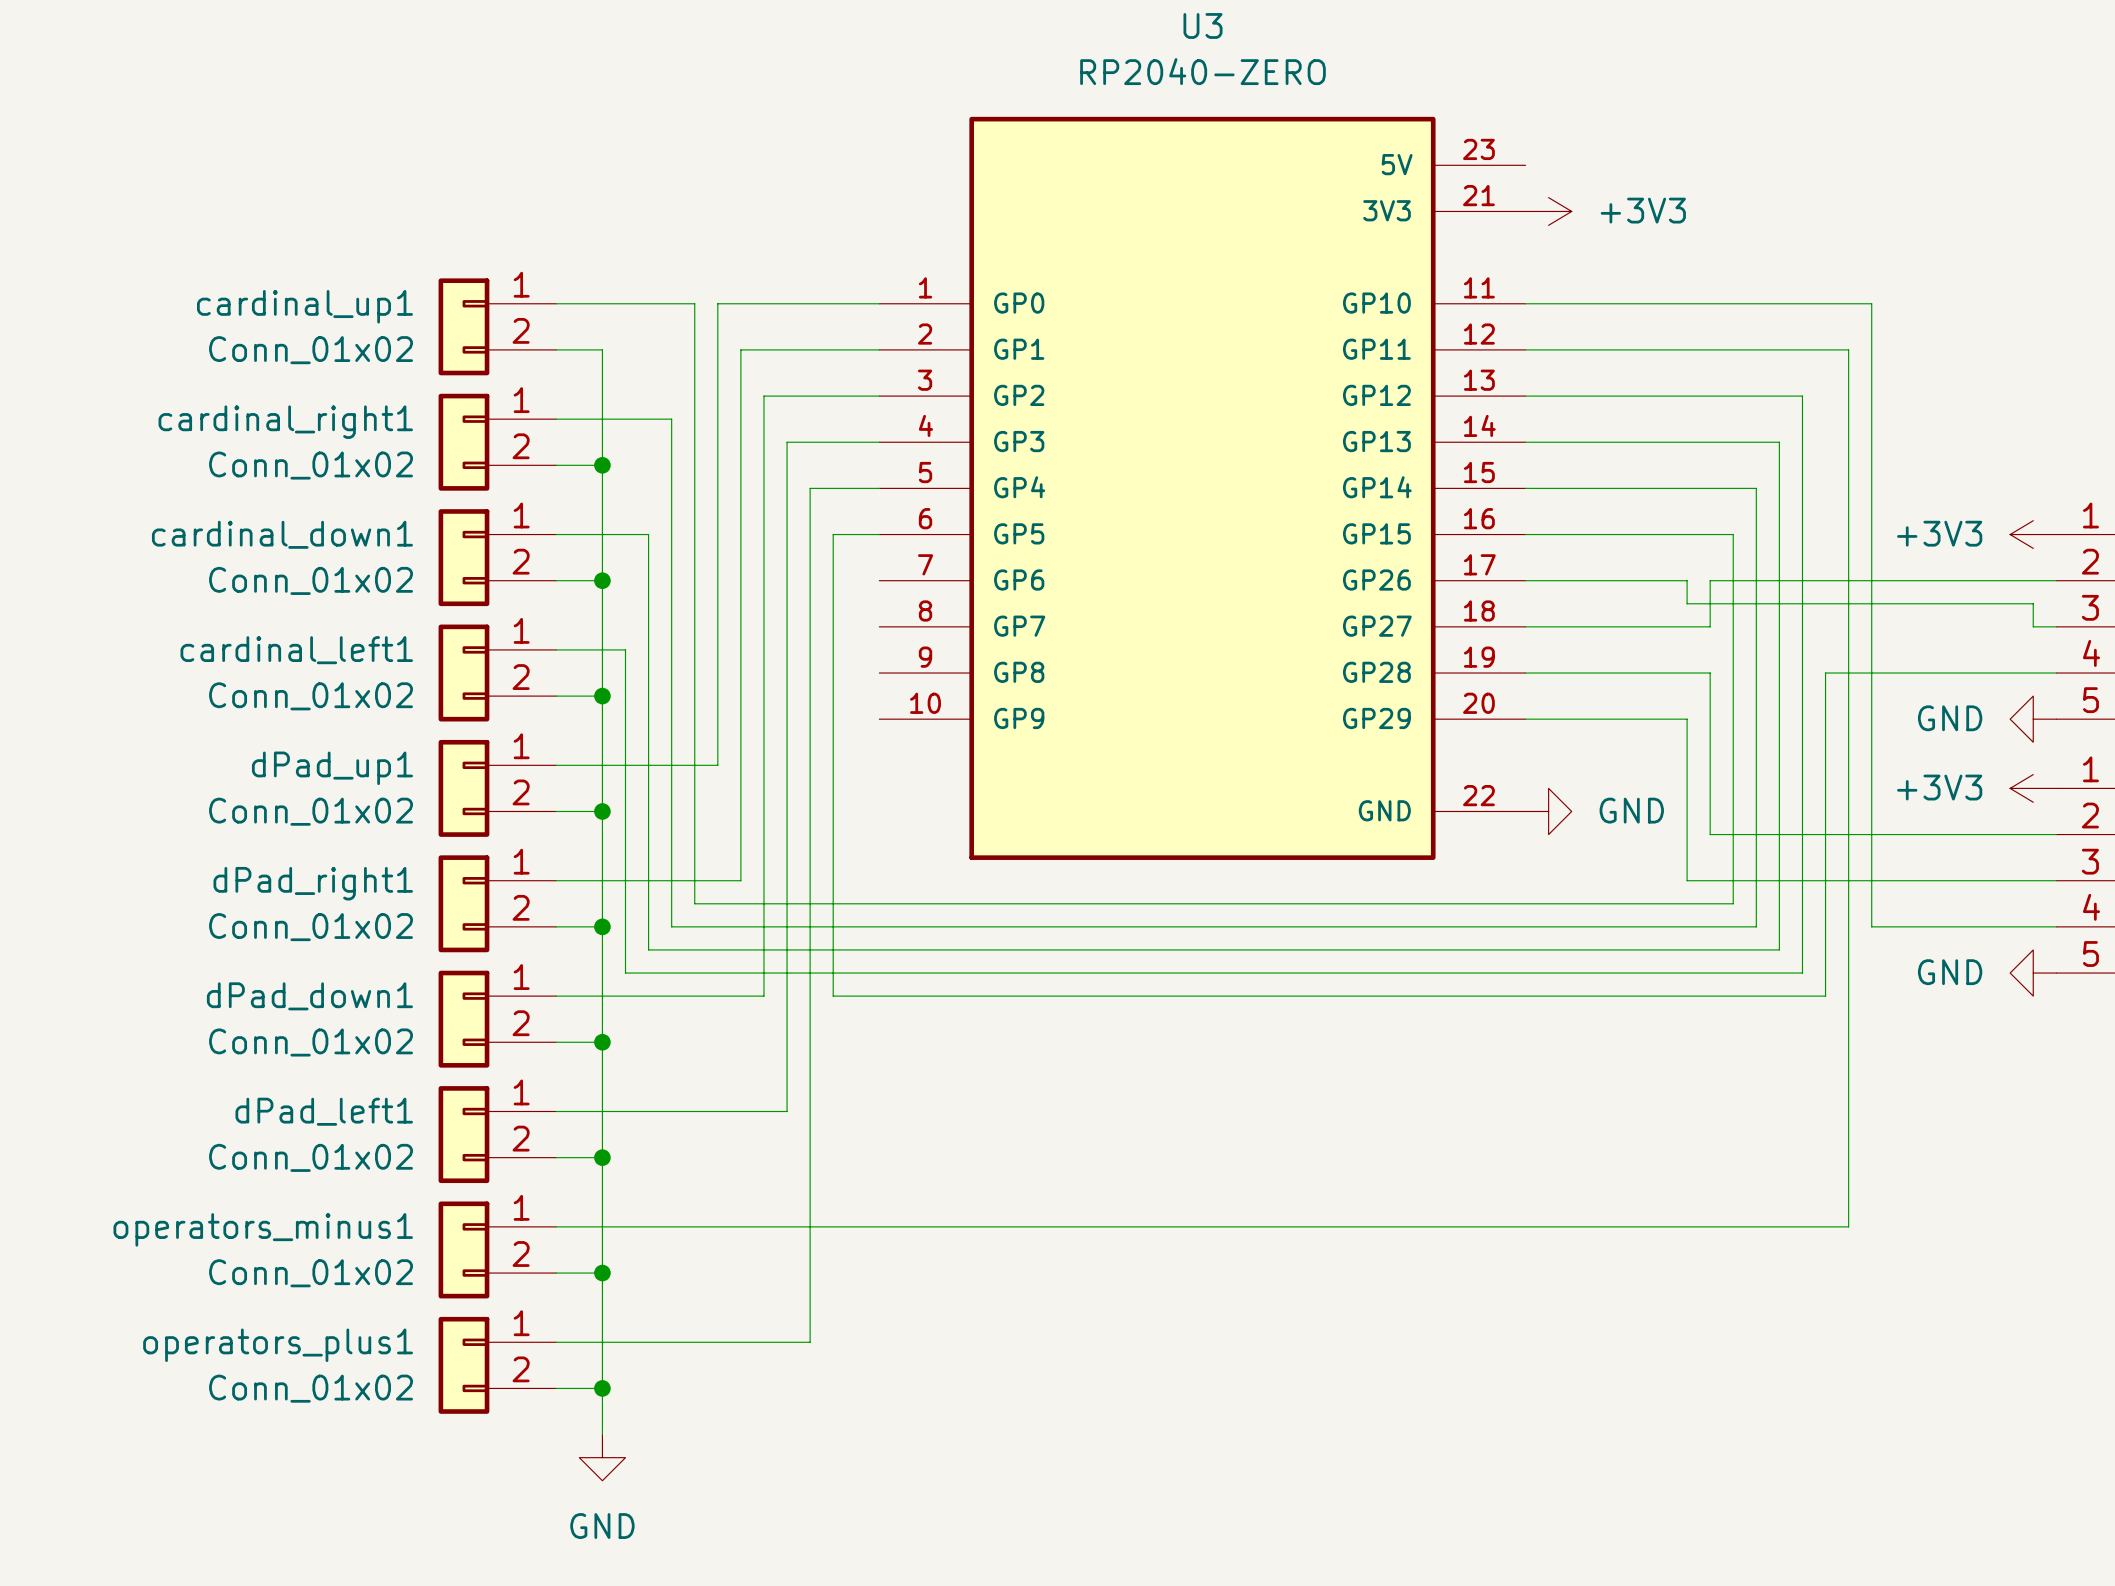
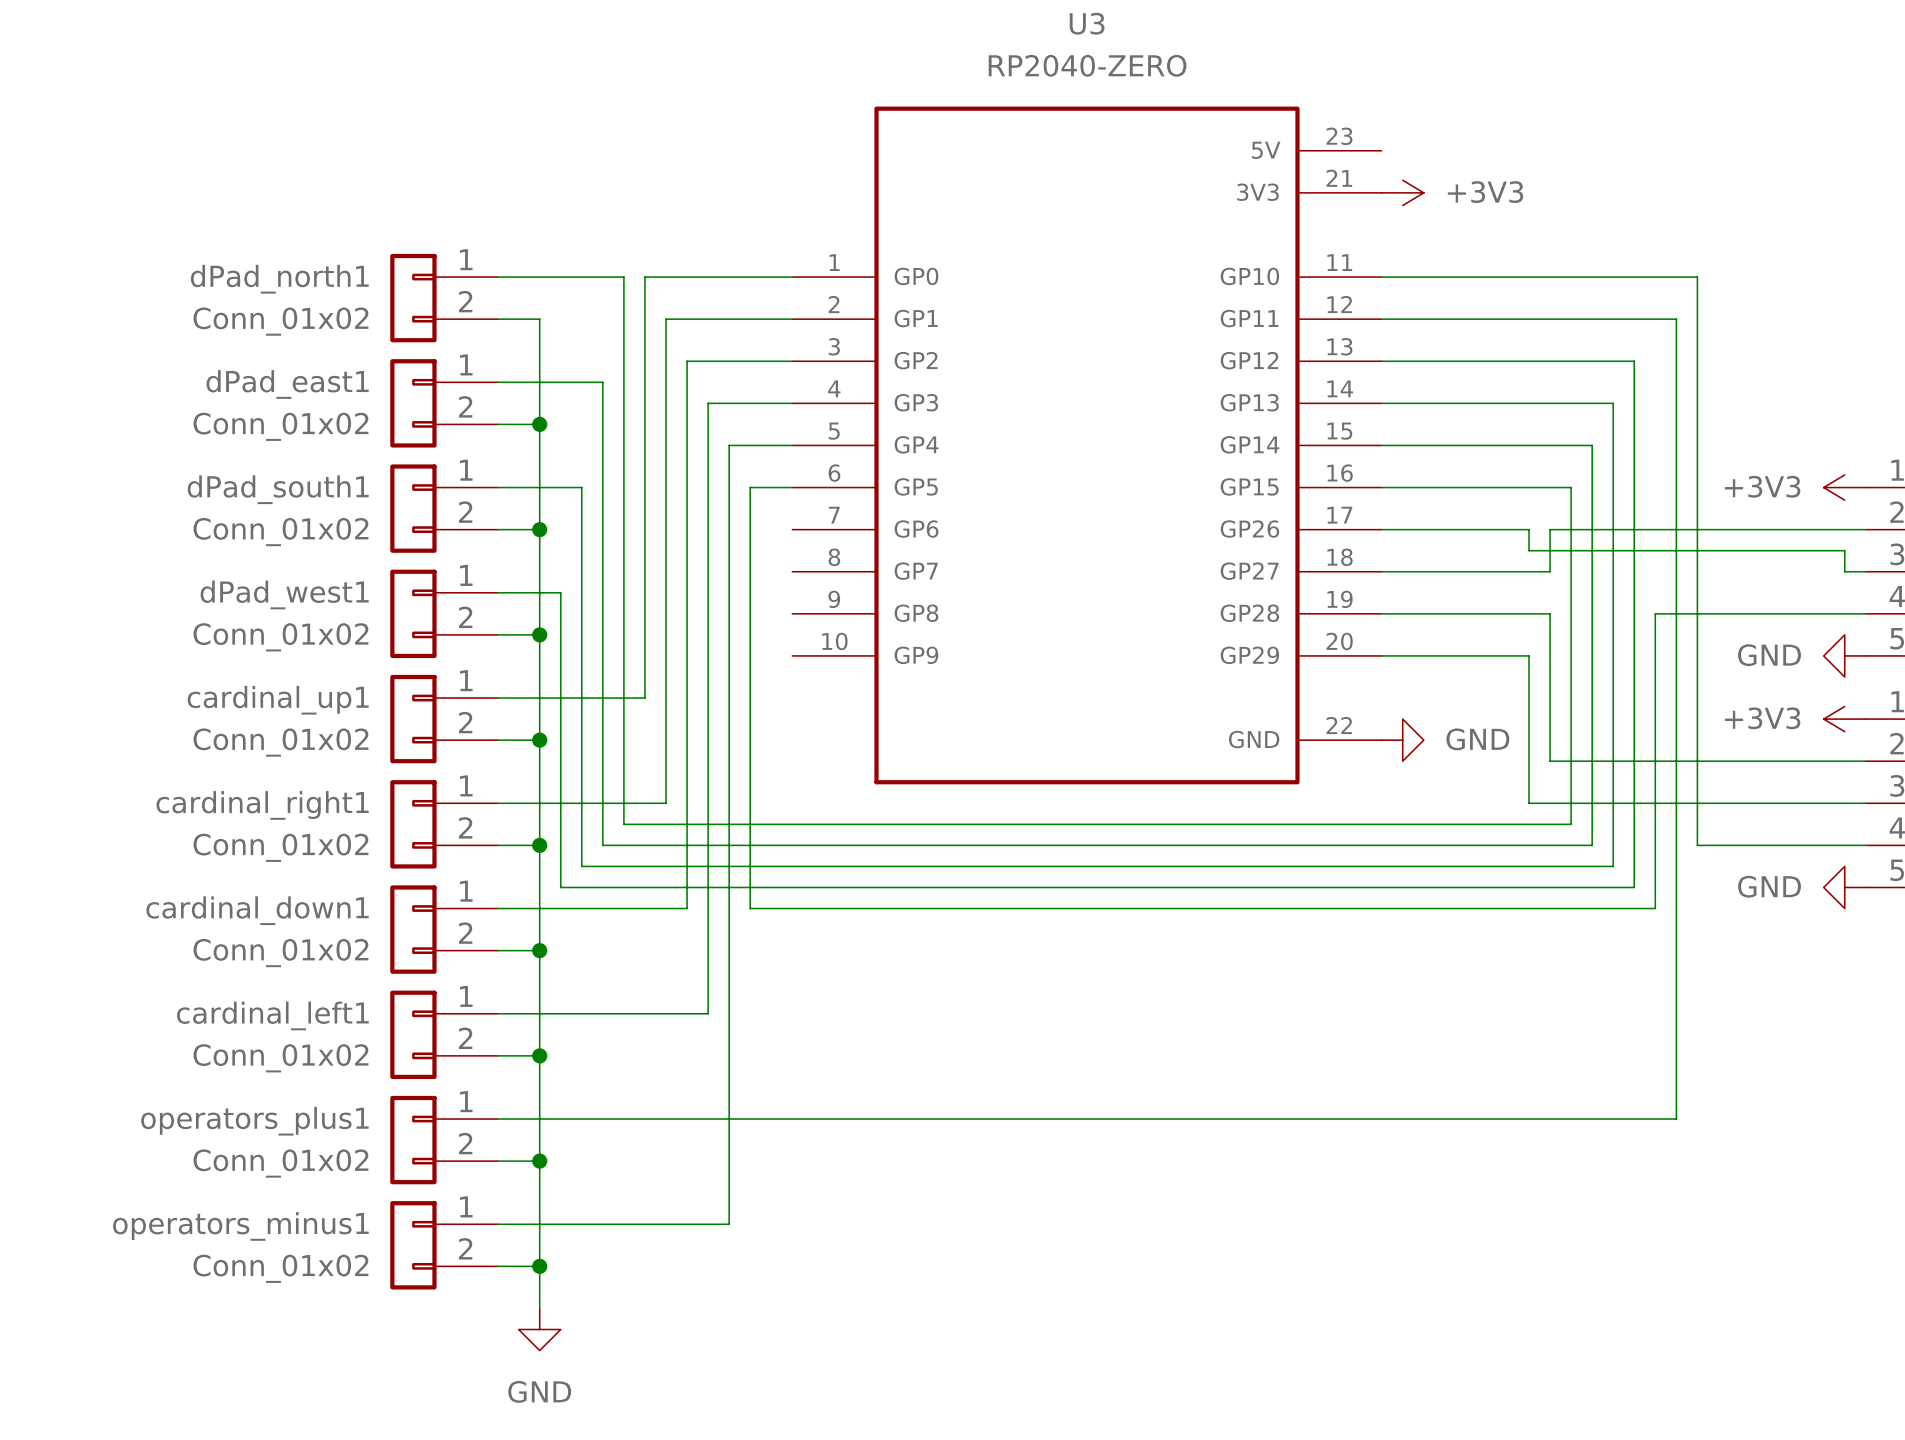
cardinal_up1 name: cardinal_up1 (304, 306) -> dPad_north1 (279, 279)
cardinal_right1 name: cardinal_right1 (285, 422) -> dPad_east1 (287, 384)
cardinal_down1 name: cardinal_down1 (282, 534) -> dPad_south1 (278, 489)
cardinal_left1 name: cardinal_left1 (296, 650) -> dPad_west1 (284, 594)
dPad_up1 name: dPad_up1 (332, 768) -> cardinal_up1 (278, 700)
dPad_right1 name: dPad_right1 (313, 883) -> cardinal_right1 (262, 805)
dPad_down1 name: dPad_down1 (309, 996) -> cardinal_down1 (257, 910)
dPad_left1 name: dPad_left1 (324, 1111) -> cardinal_left1 (272, 1015)
operators_minus1 name: operators_minus1 (263, 1229) -> operators_plus1 (254, 1121)
operators_plus1 name: operators_plus1 (278, 1345) -> operators_minus1 (240, 1226)

